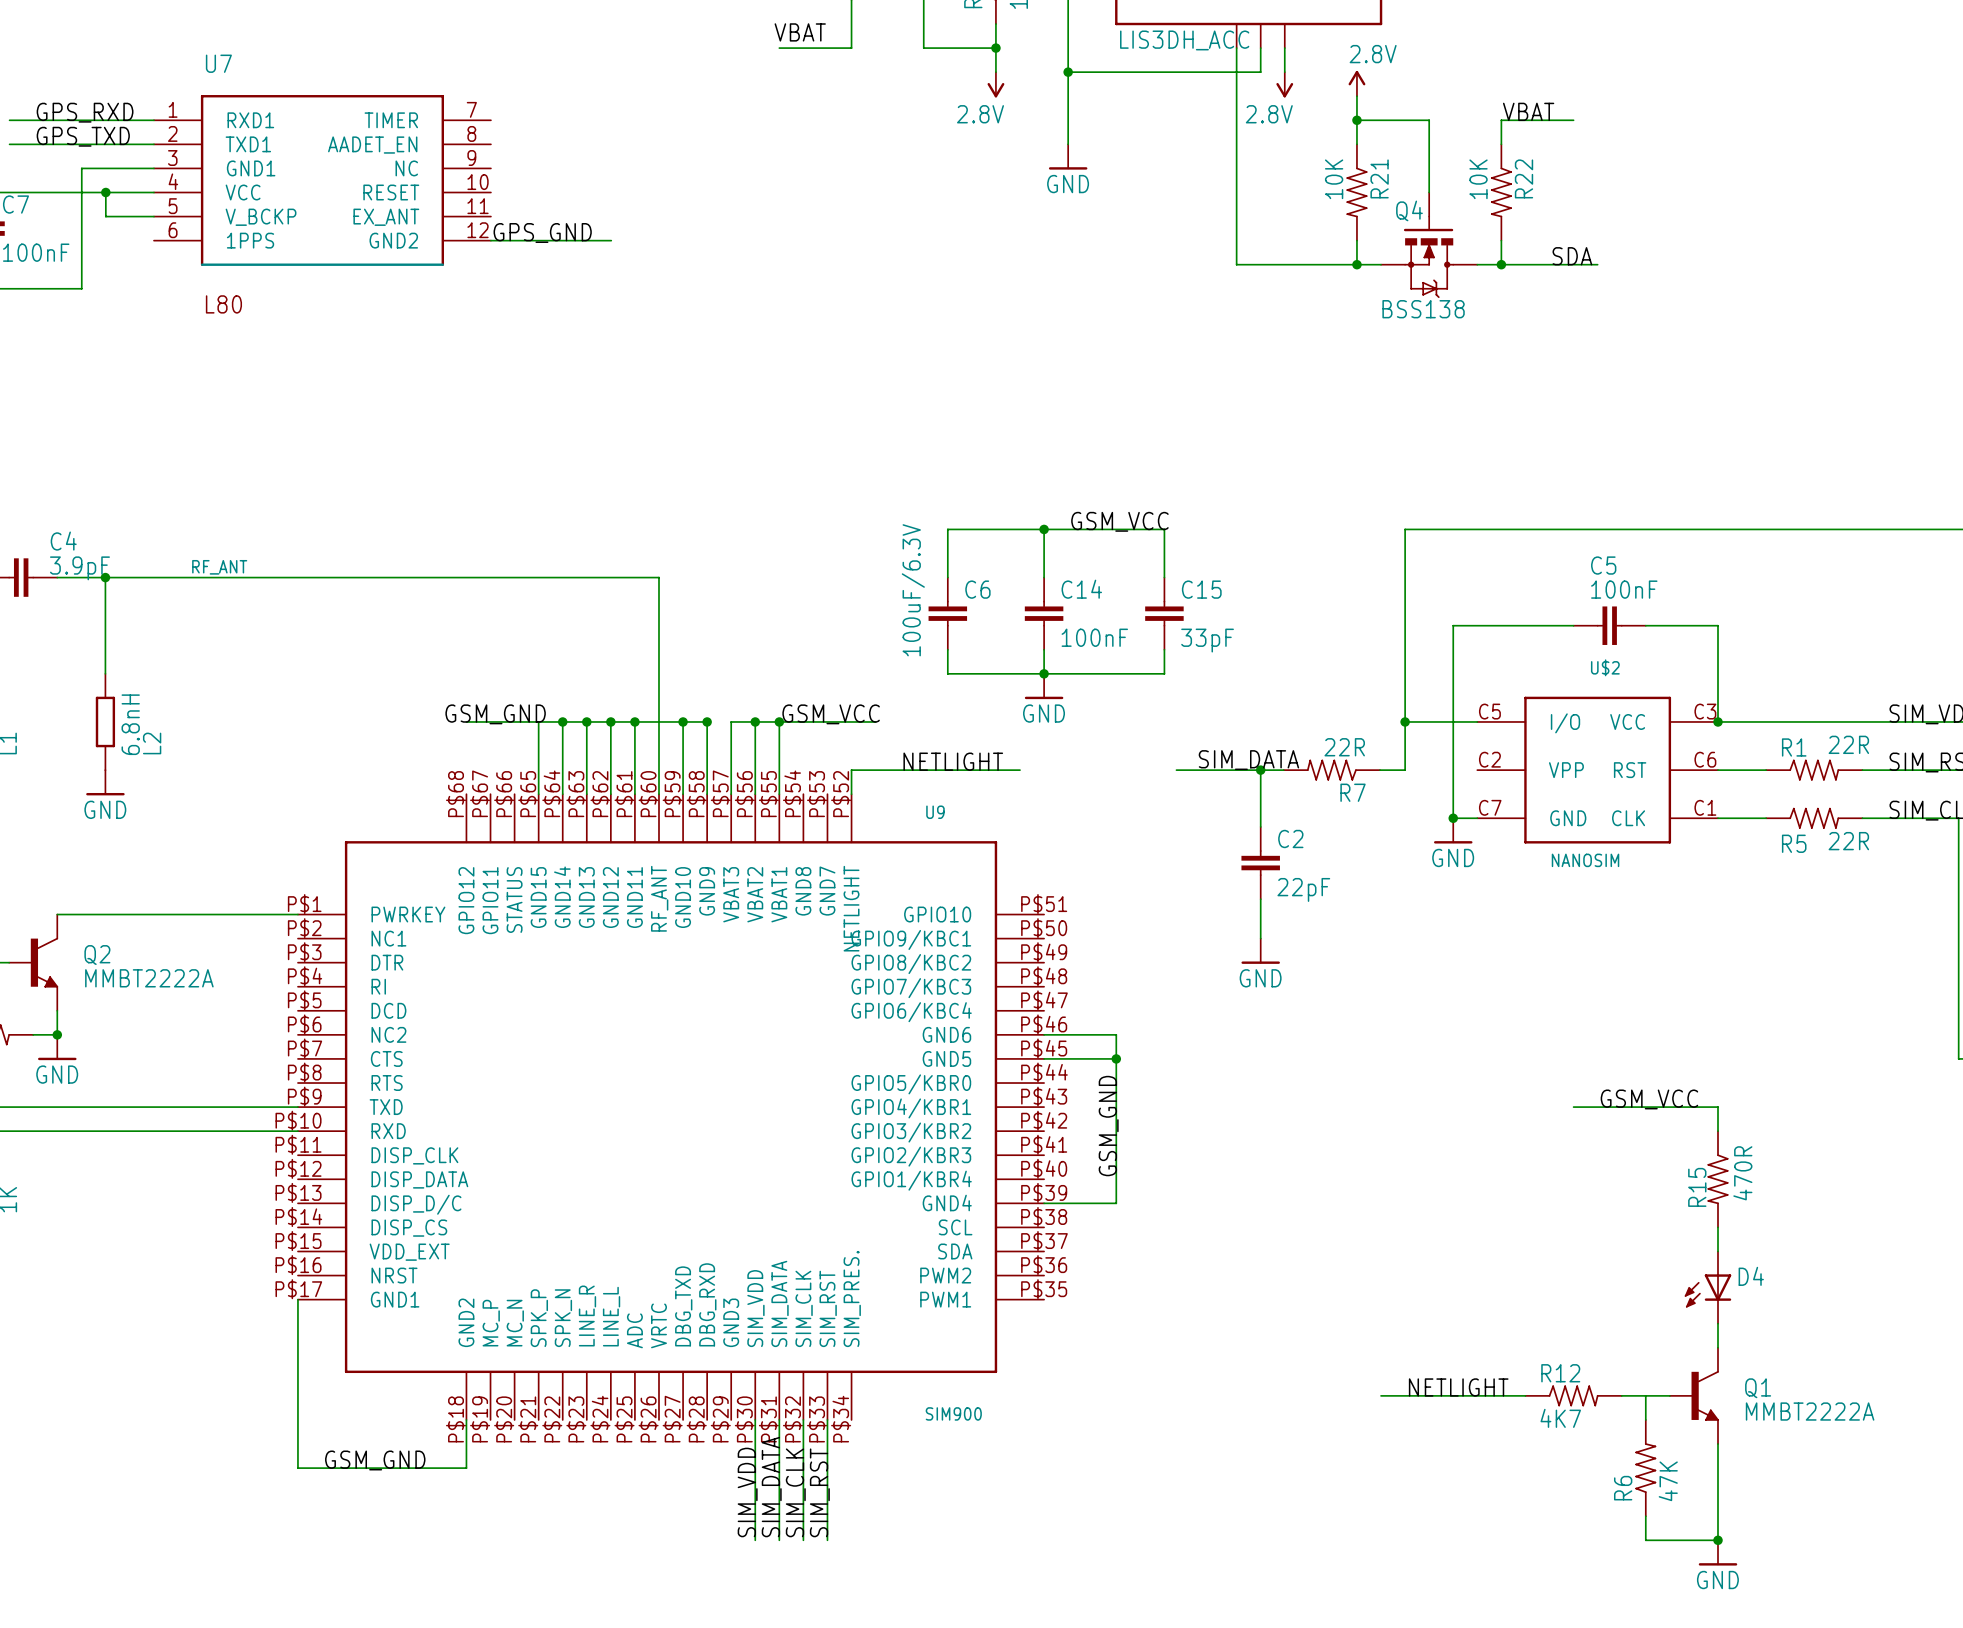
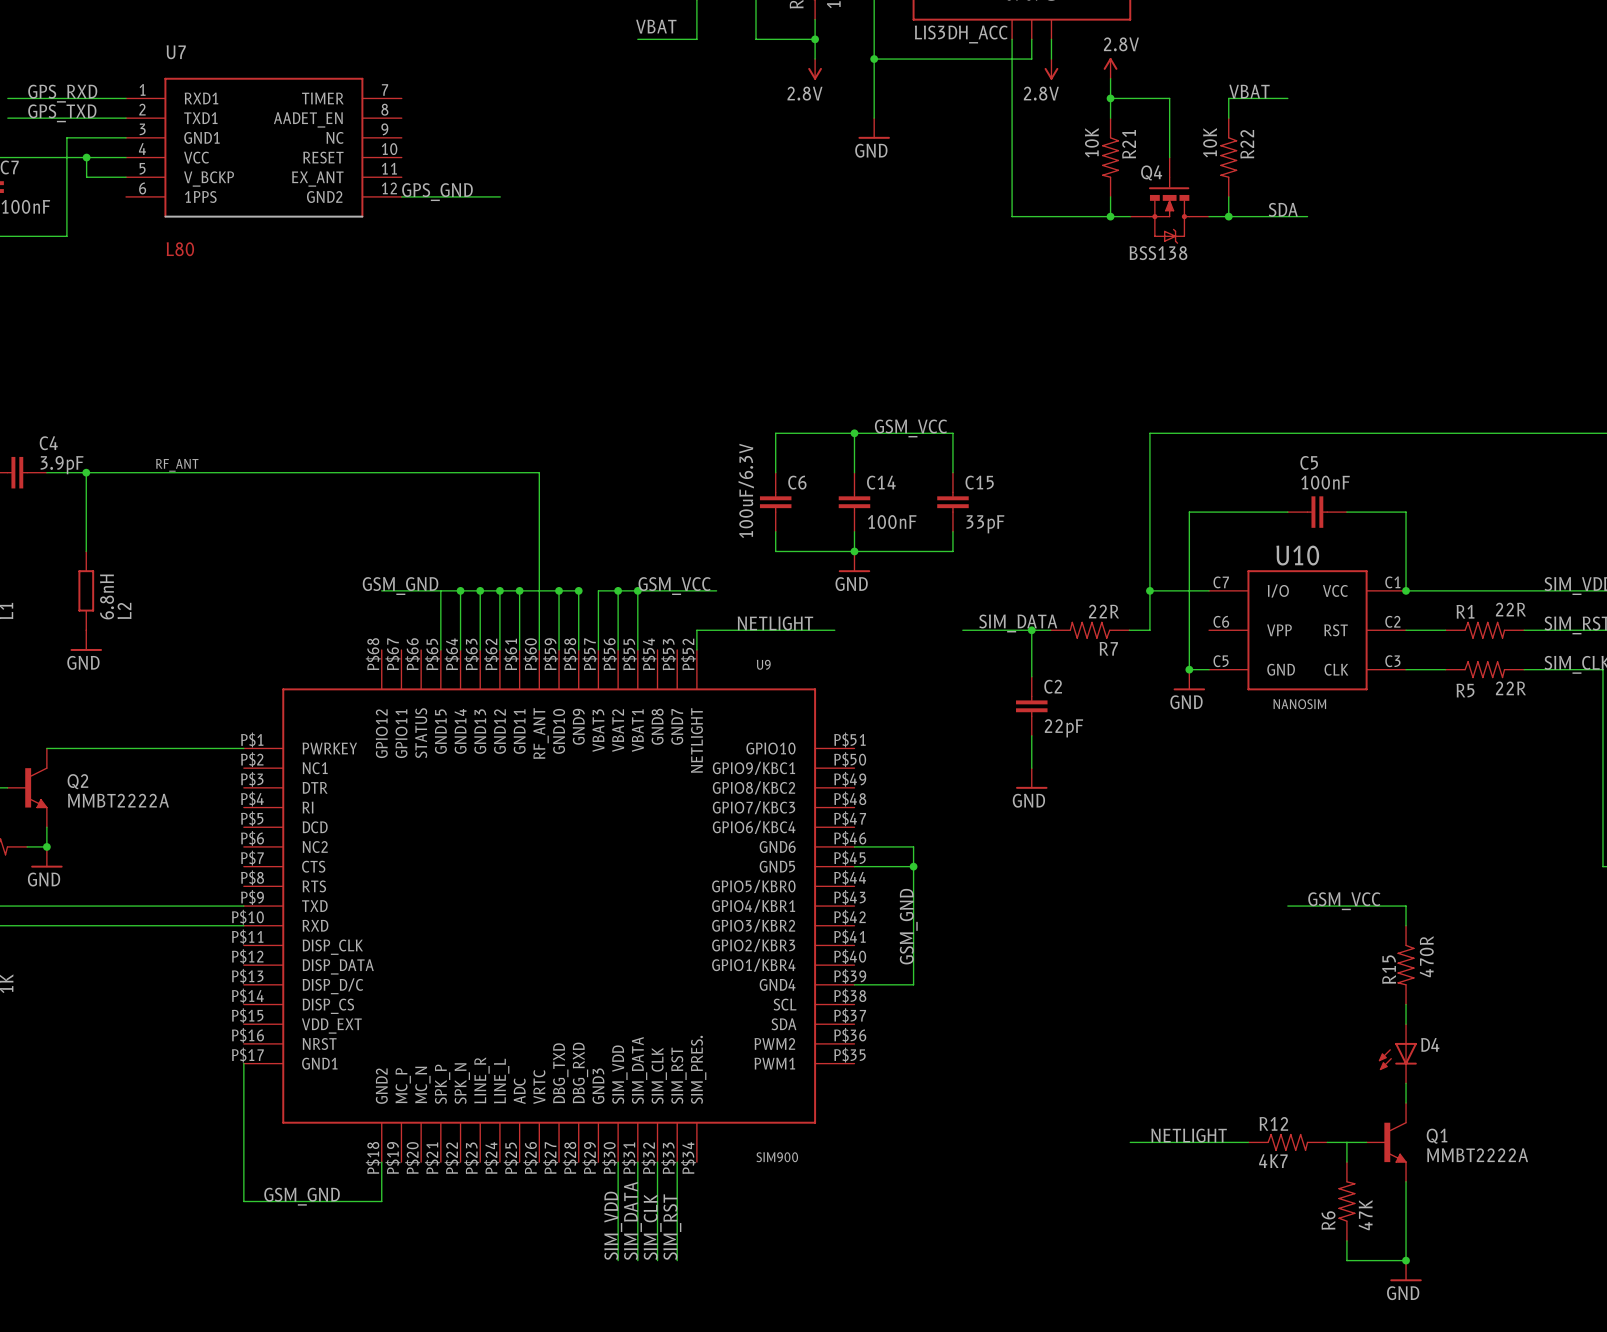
U$2 name: U$2 (1605, 667) -> U10 (1297, 555)
U$2 pin number: C5 (1489, 711) -> C7 (1221, 582)
U$2 pin number: C3 (1705, 711) -> C1 (1392, 582)
U$2 pin number: C2 (1489, 759) -> C6 (1221, 621)
U$2 pin number: C6 (1705, 759) -> C2 (1392, 621)
U$2 pin number: C7 (1490, 807) -> C5 (1221, 661)
U$2 pin number: C1 (1705, 807) -> C3 (1392, 661)

